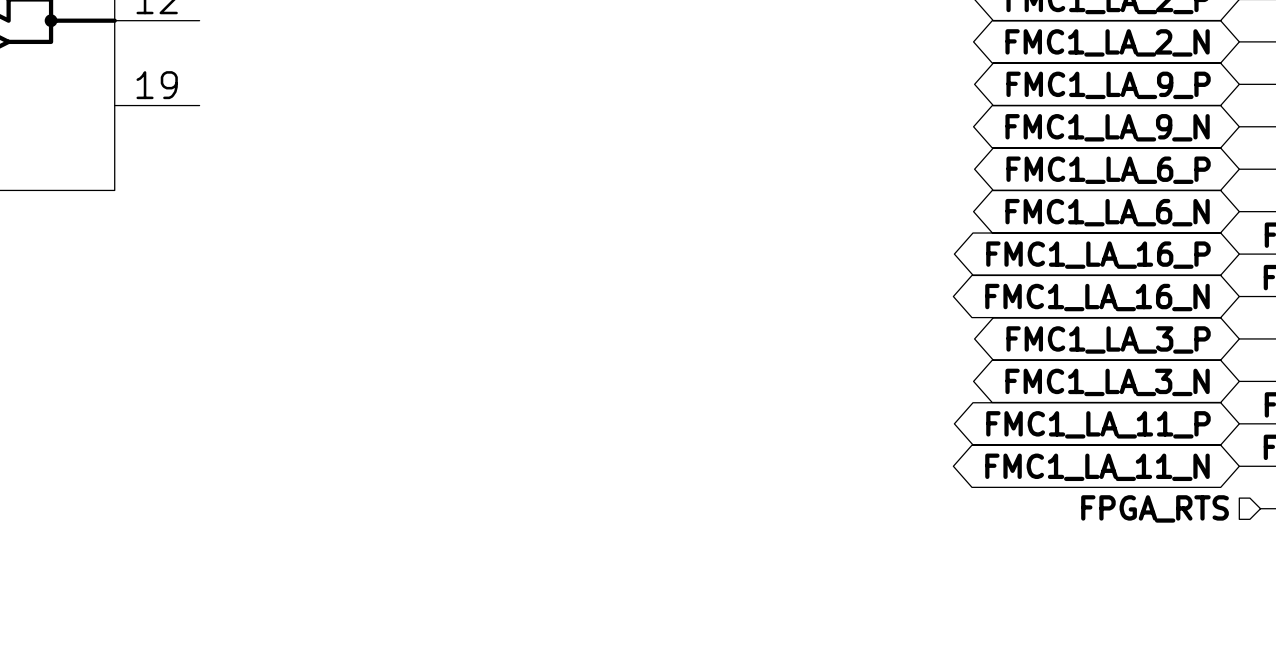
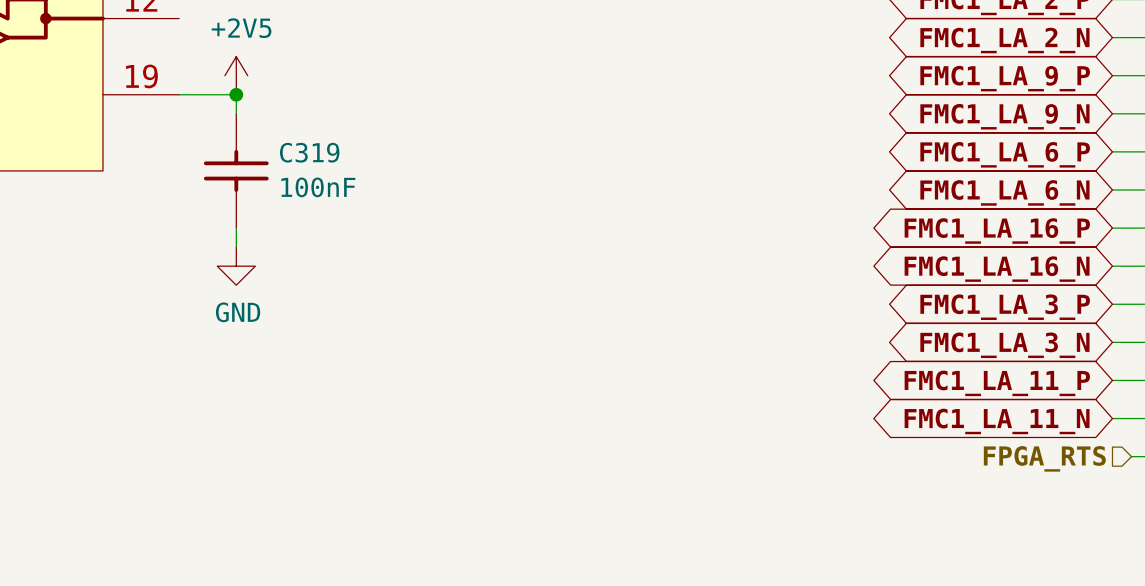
power symbol: none -> +2V5 (236, 75)
wire: none -> (179, 94) (236, 94) (236, 113)
junction: none -> (236, 94)
C319: none -> (236, 170)
wire: none -> (236, 228) (236, 247)
power symbol: none -> GND (236, 266)

